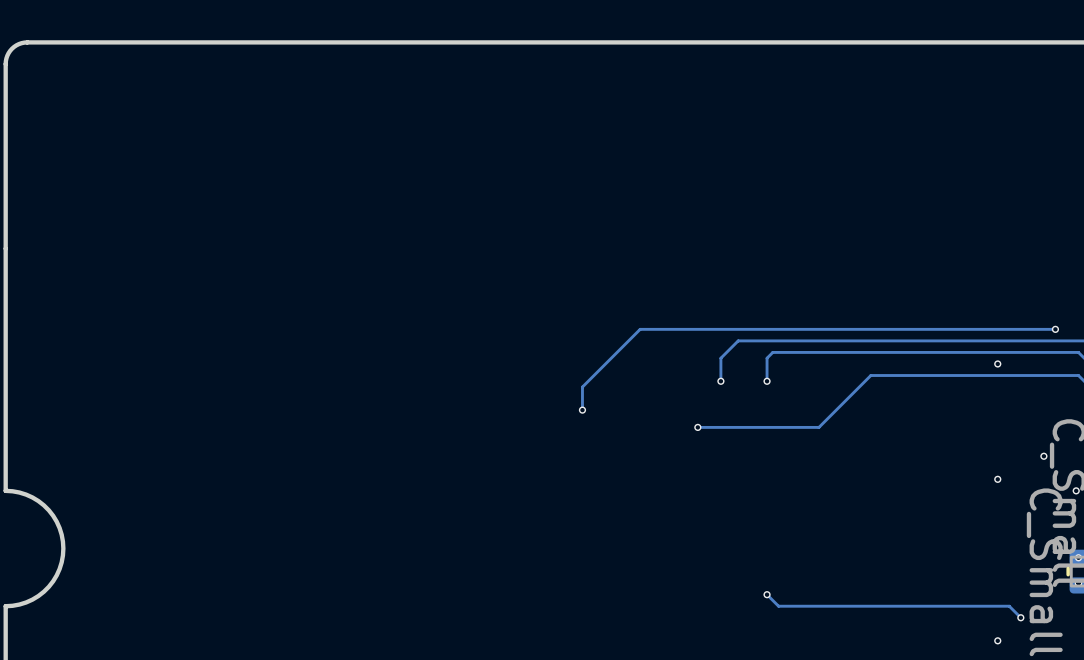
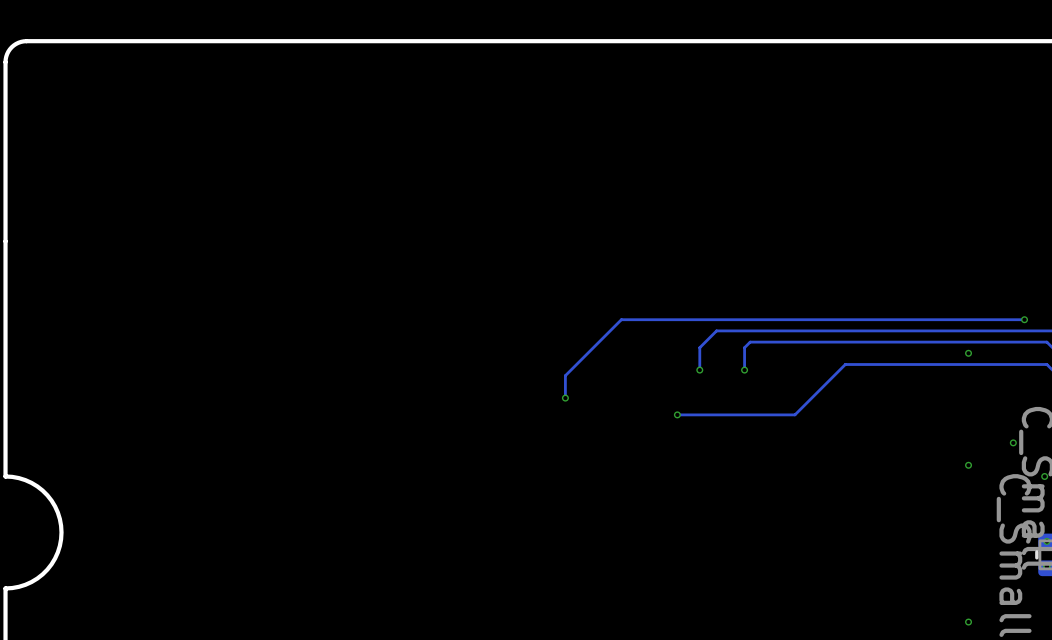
track: (767, 594) (778, 606) (1009, 606) (1020, 617) -> none
via: (767, 594) -> none
via: (1020, 617) -> none

